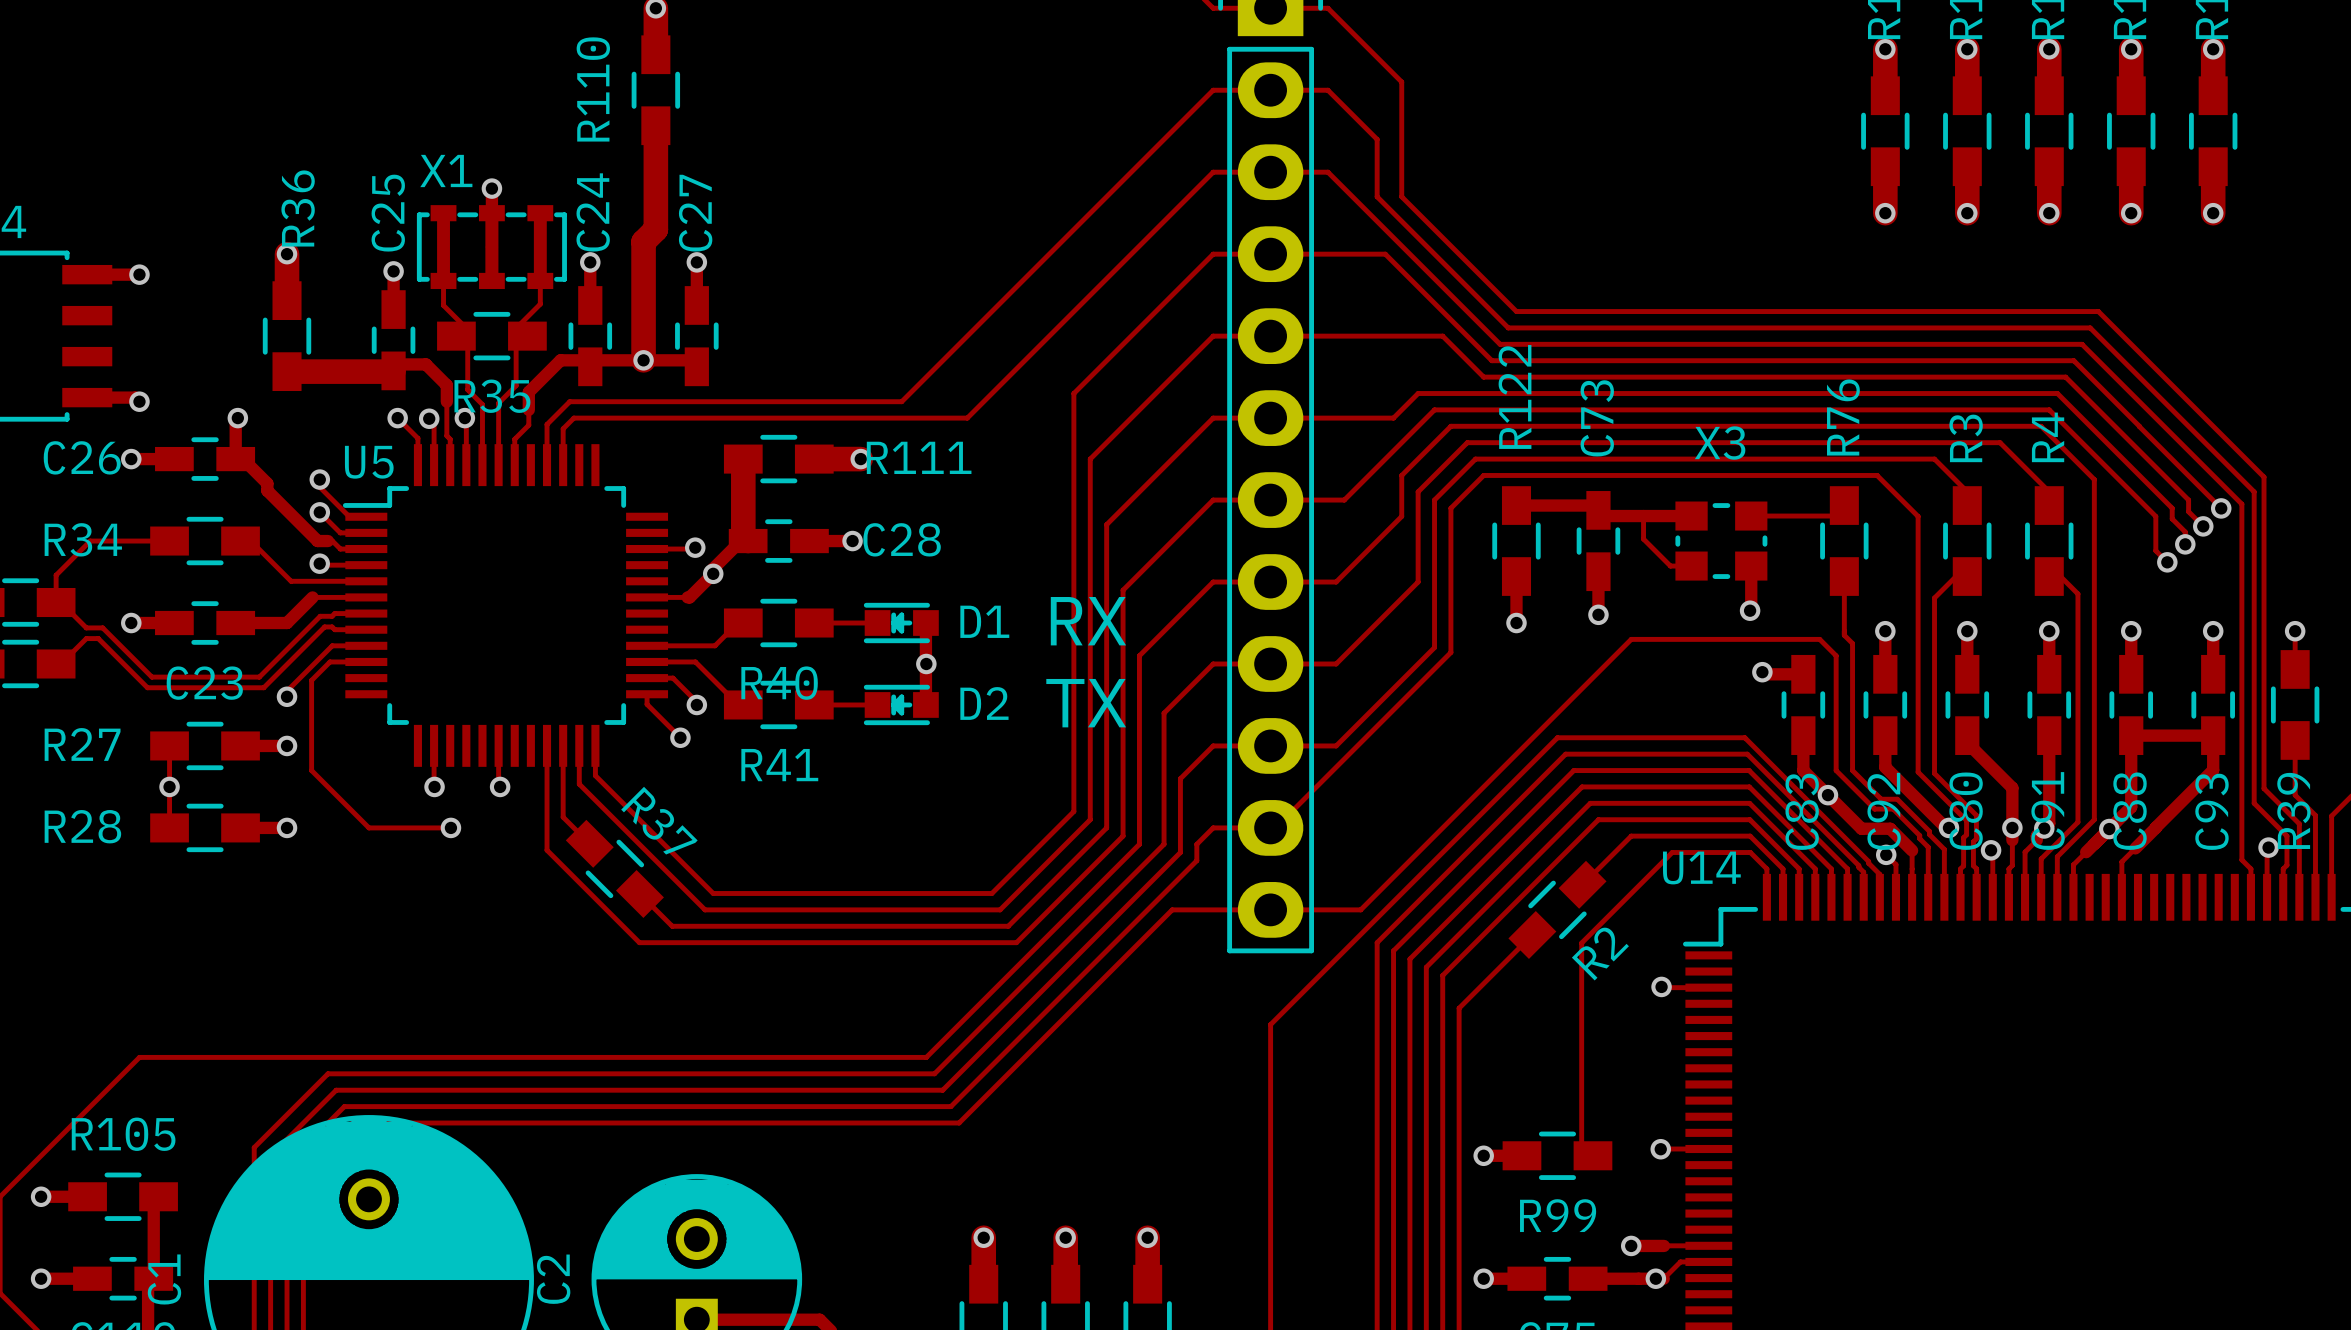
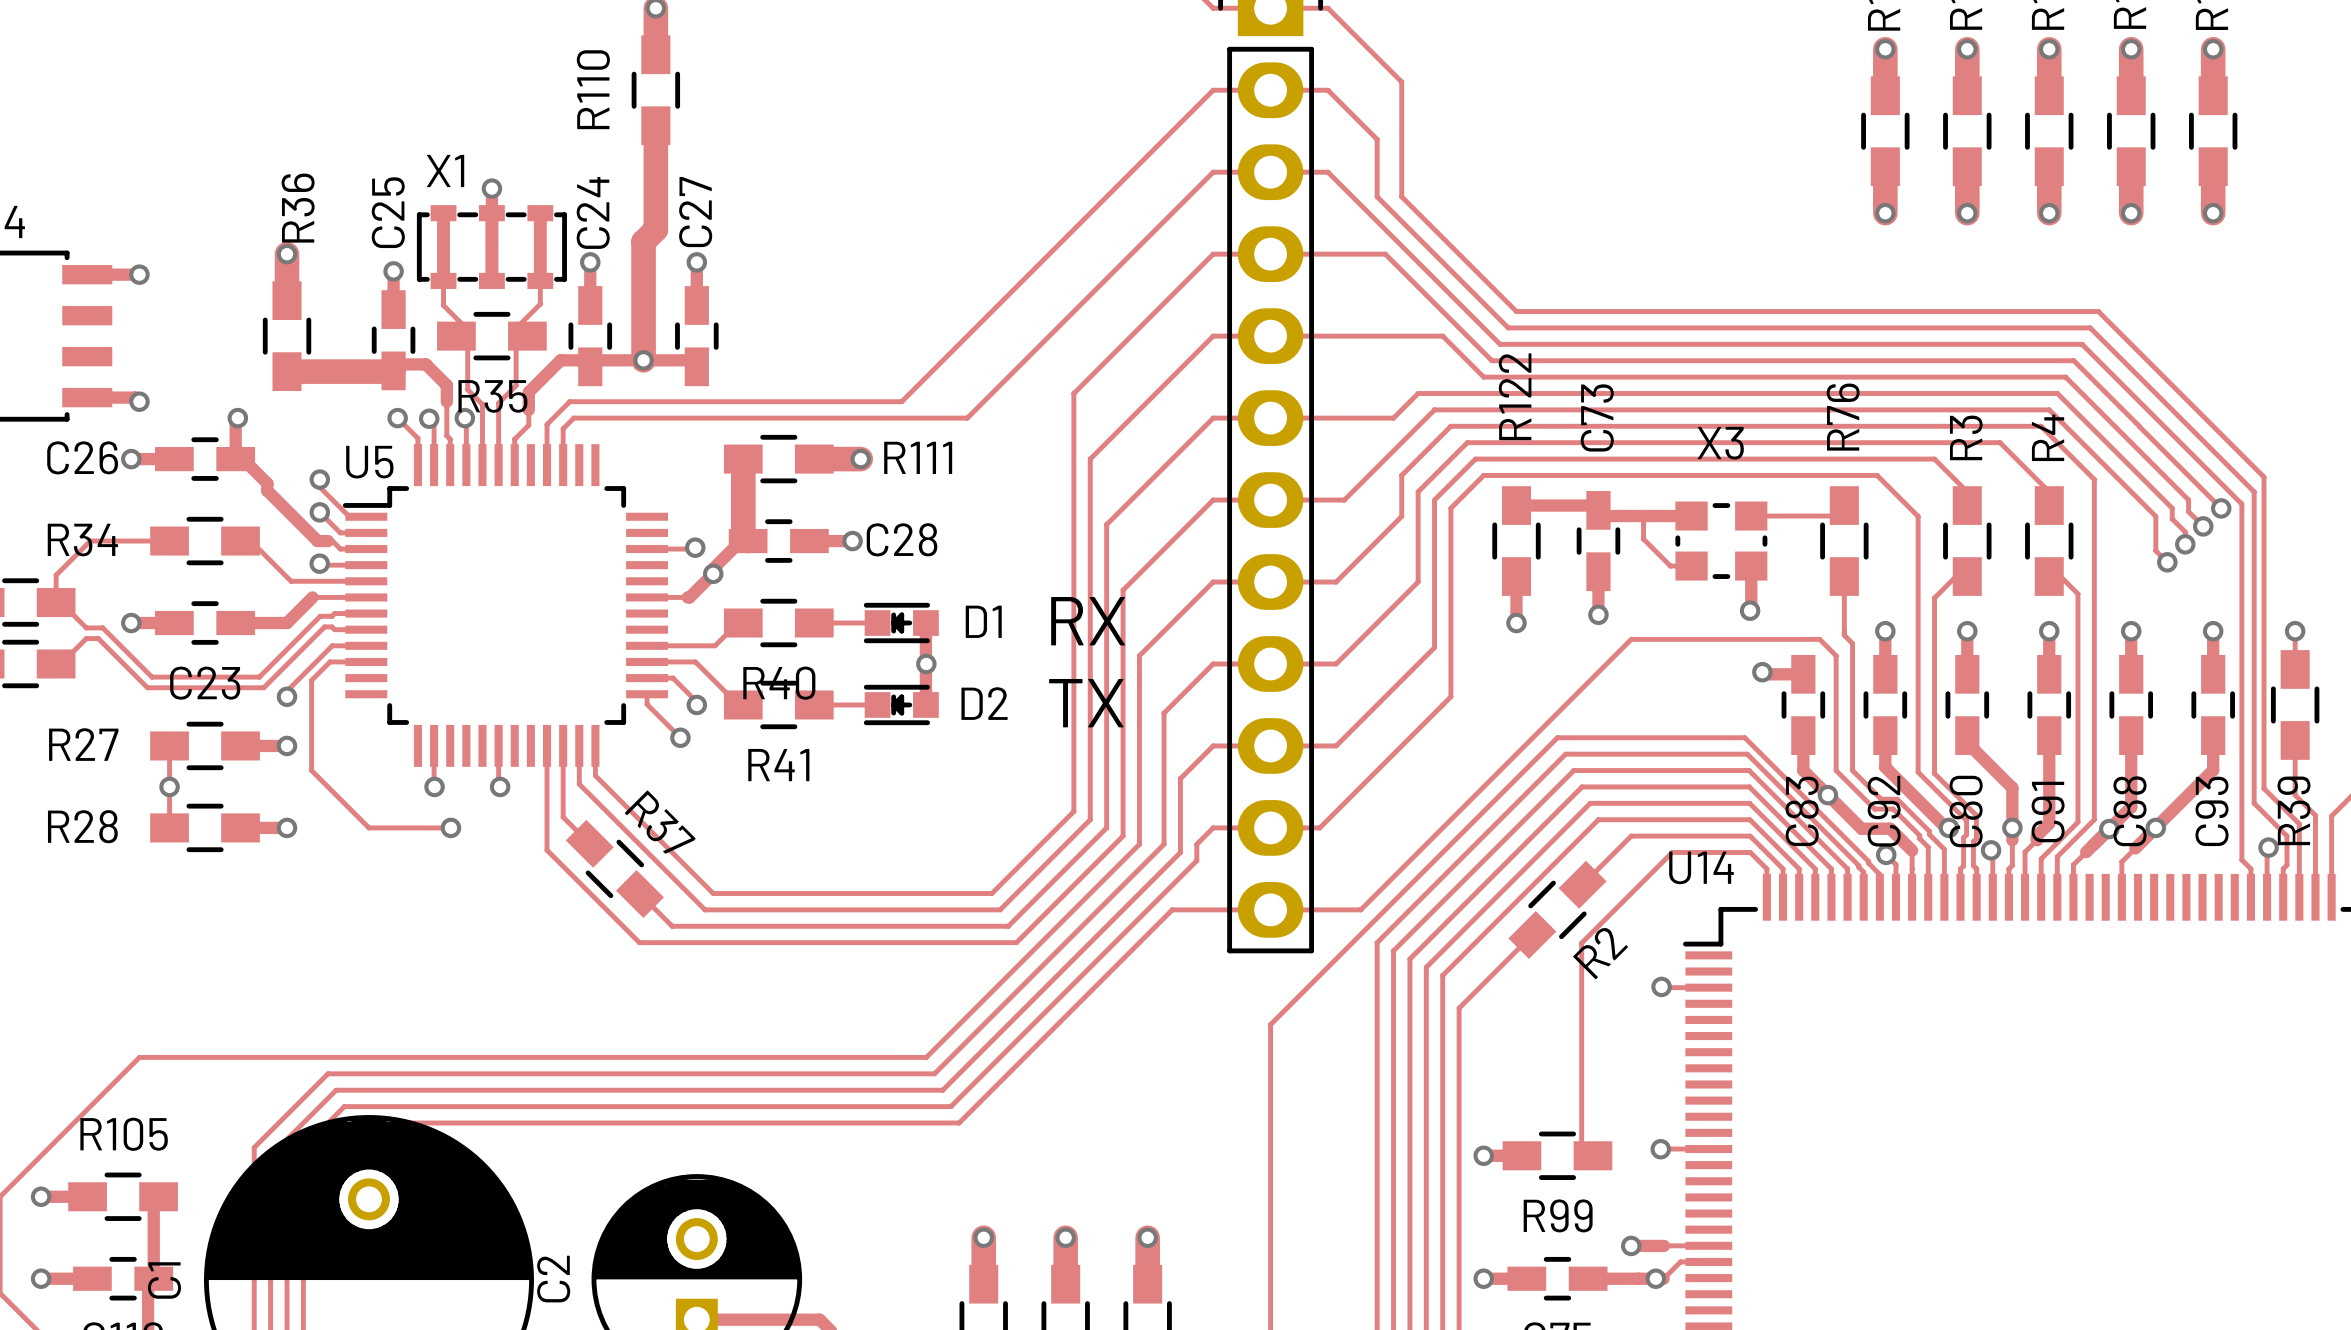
track: (1450, 652) (1275, 827) -> (1450, 652) (1450, 696) (1319, 827) (1275, 827)
track: (2131, 735) (2213, 735) -> none
via position: (2044, 828) -> (2155, 827)

